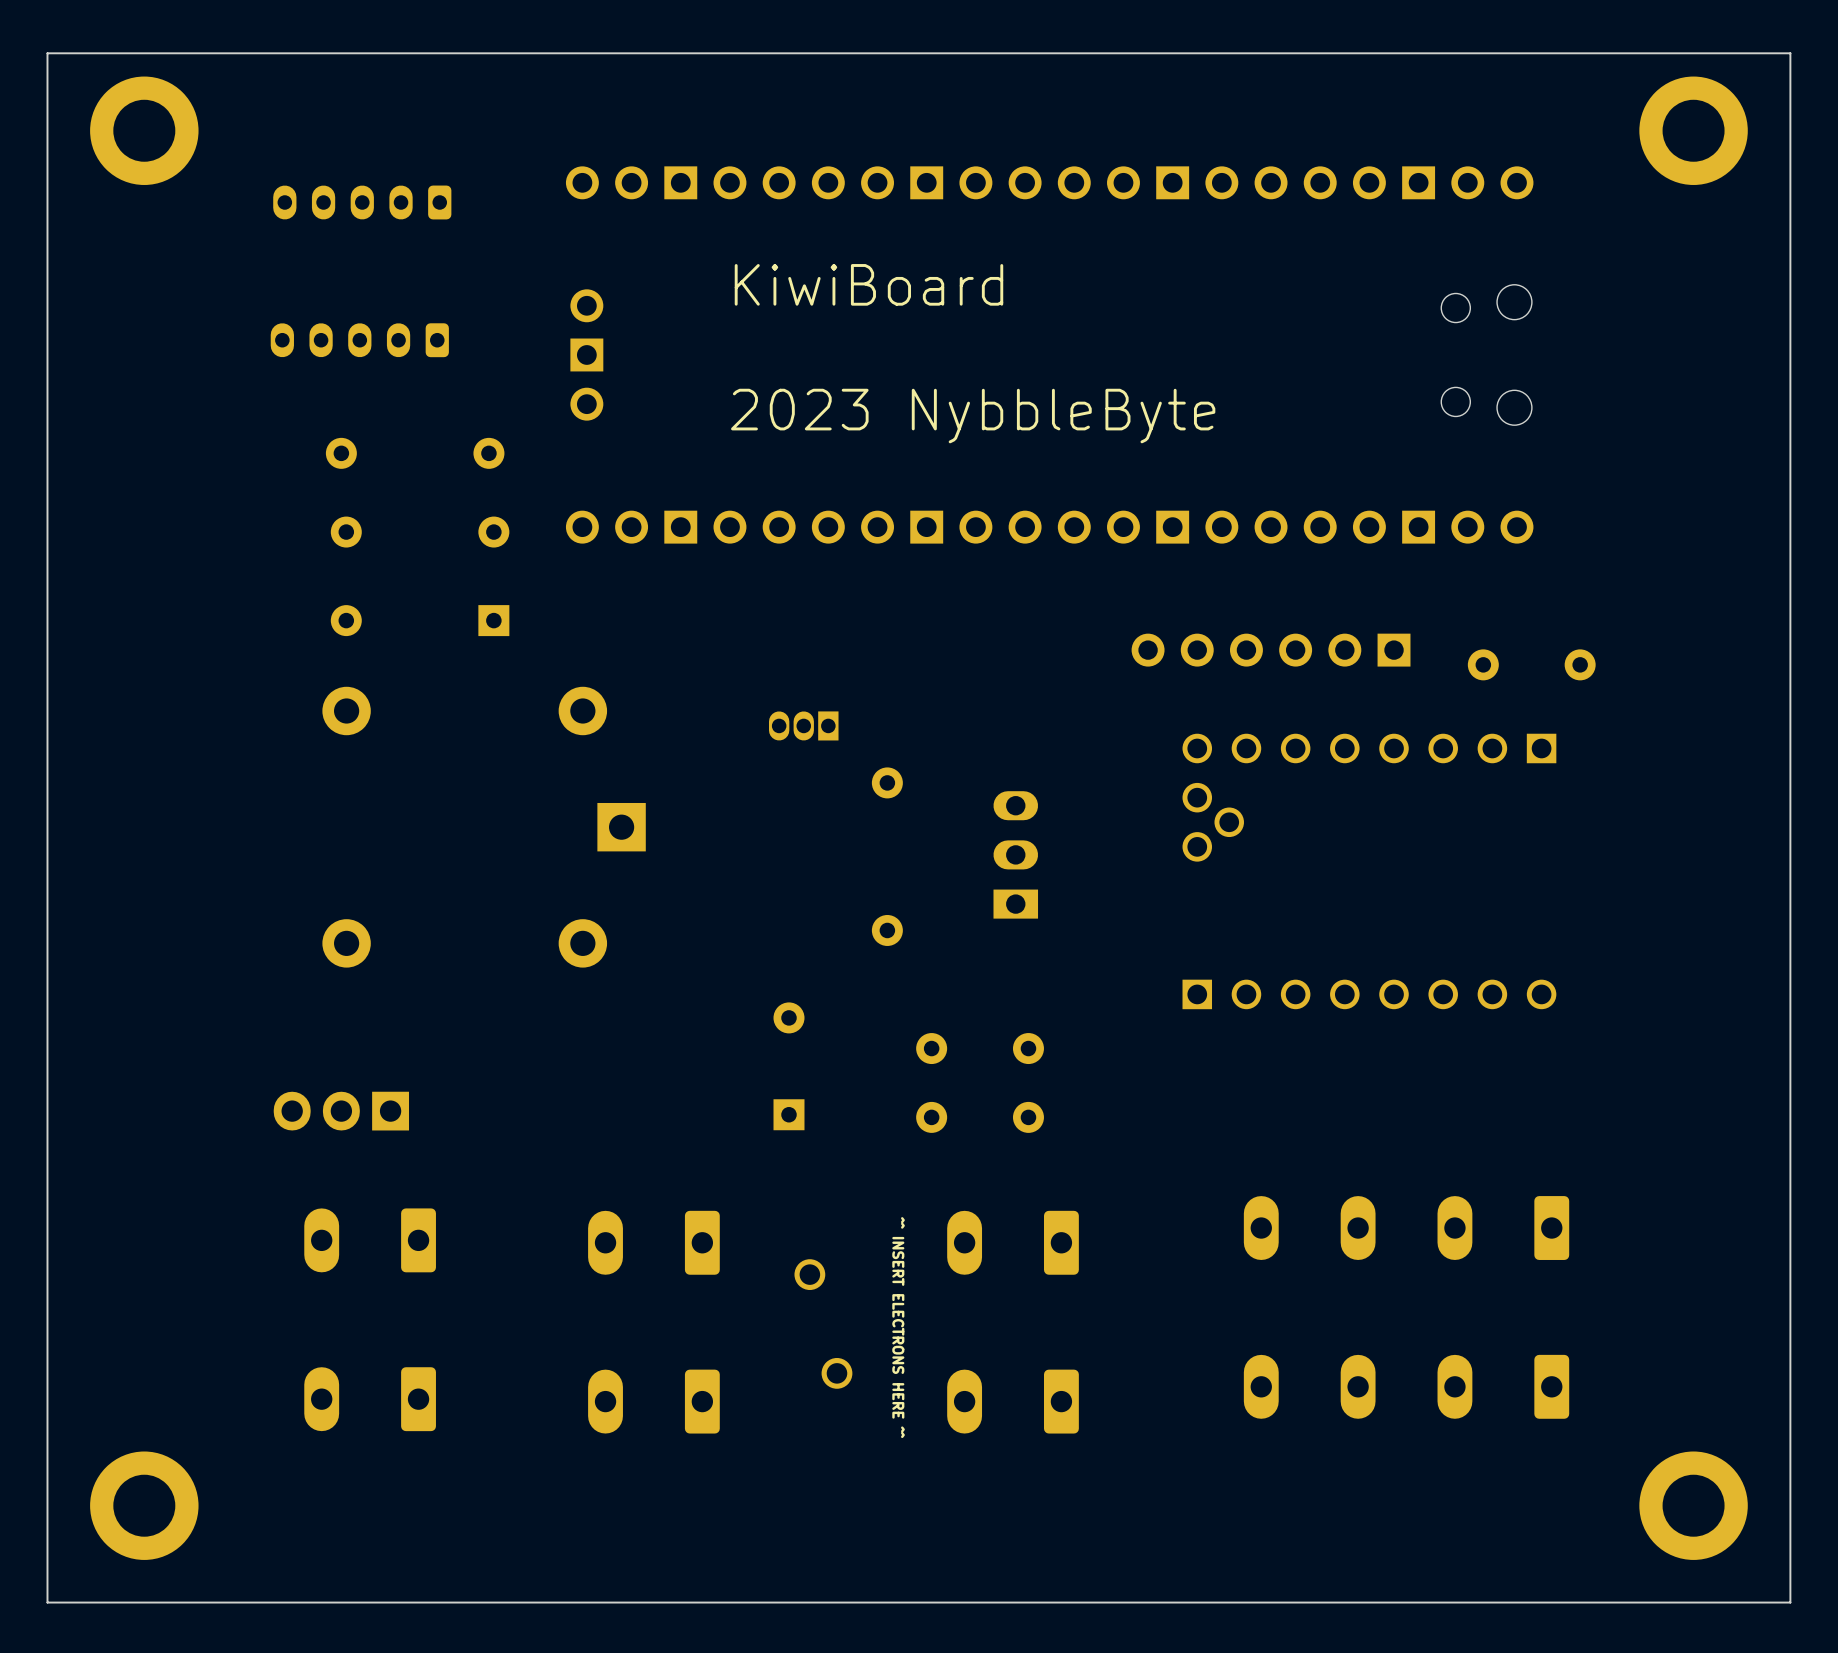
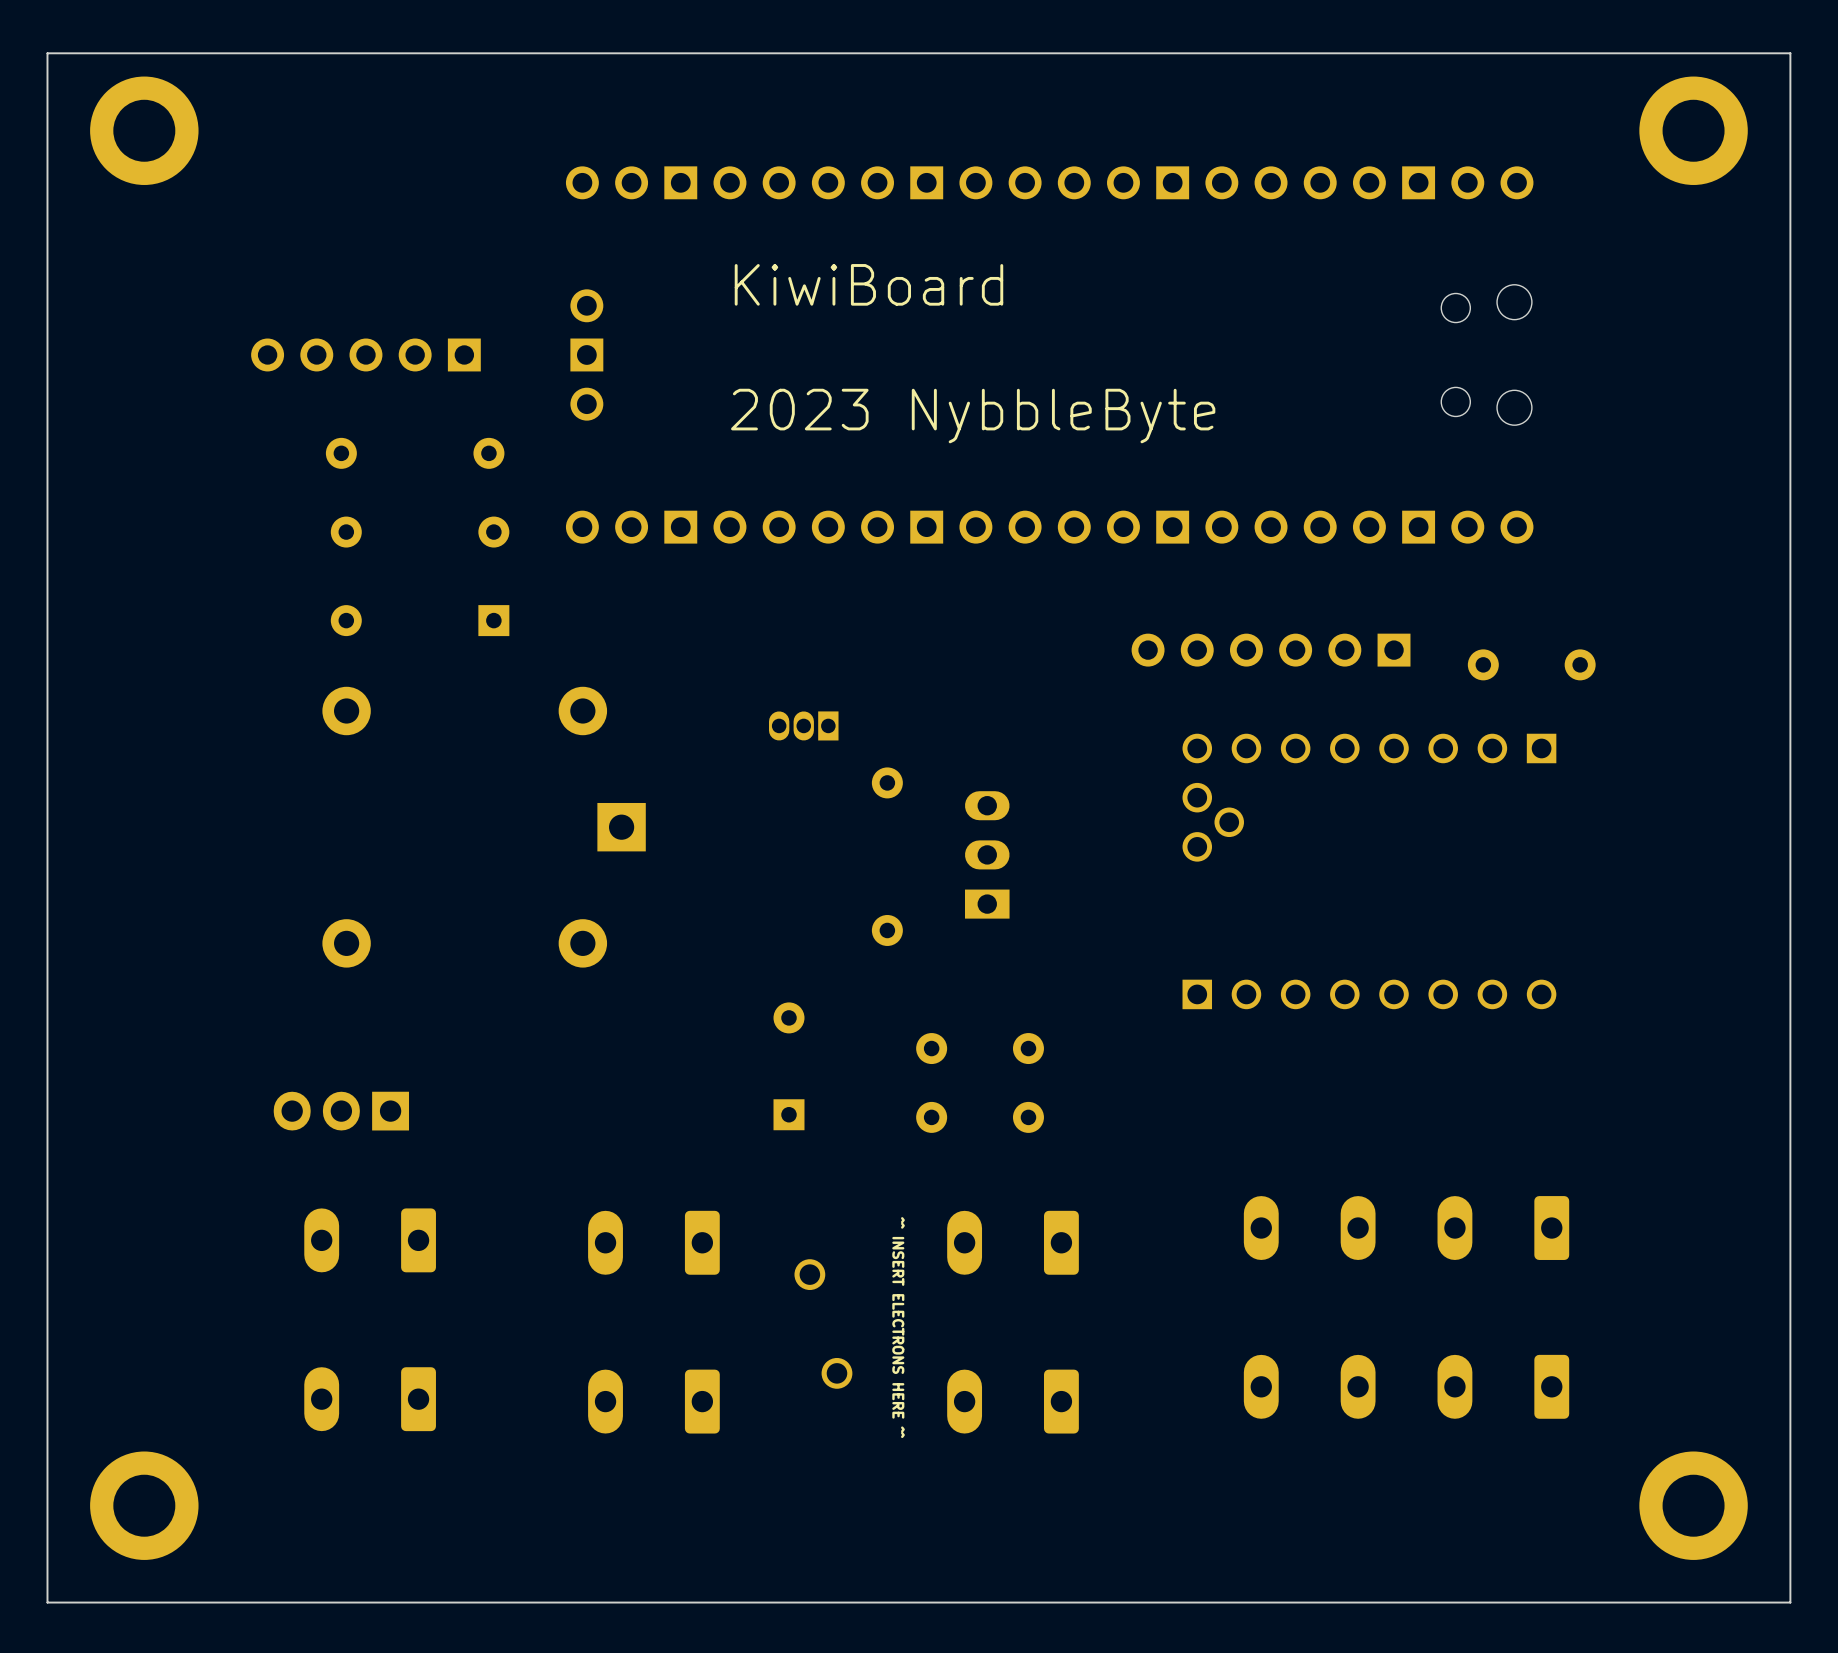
part: (362, 202) -> none
part footprint: [270, 323, 449, 358] -> [251, 338, 481, 372]
part: none -> (987, 854)
part: (1015, 854) -> none

